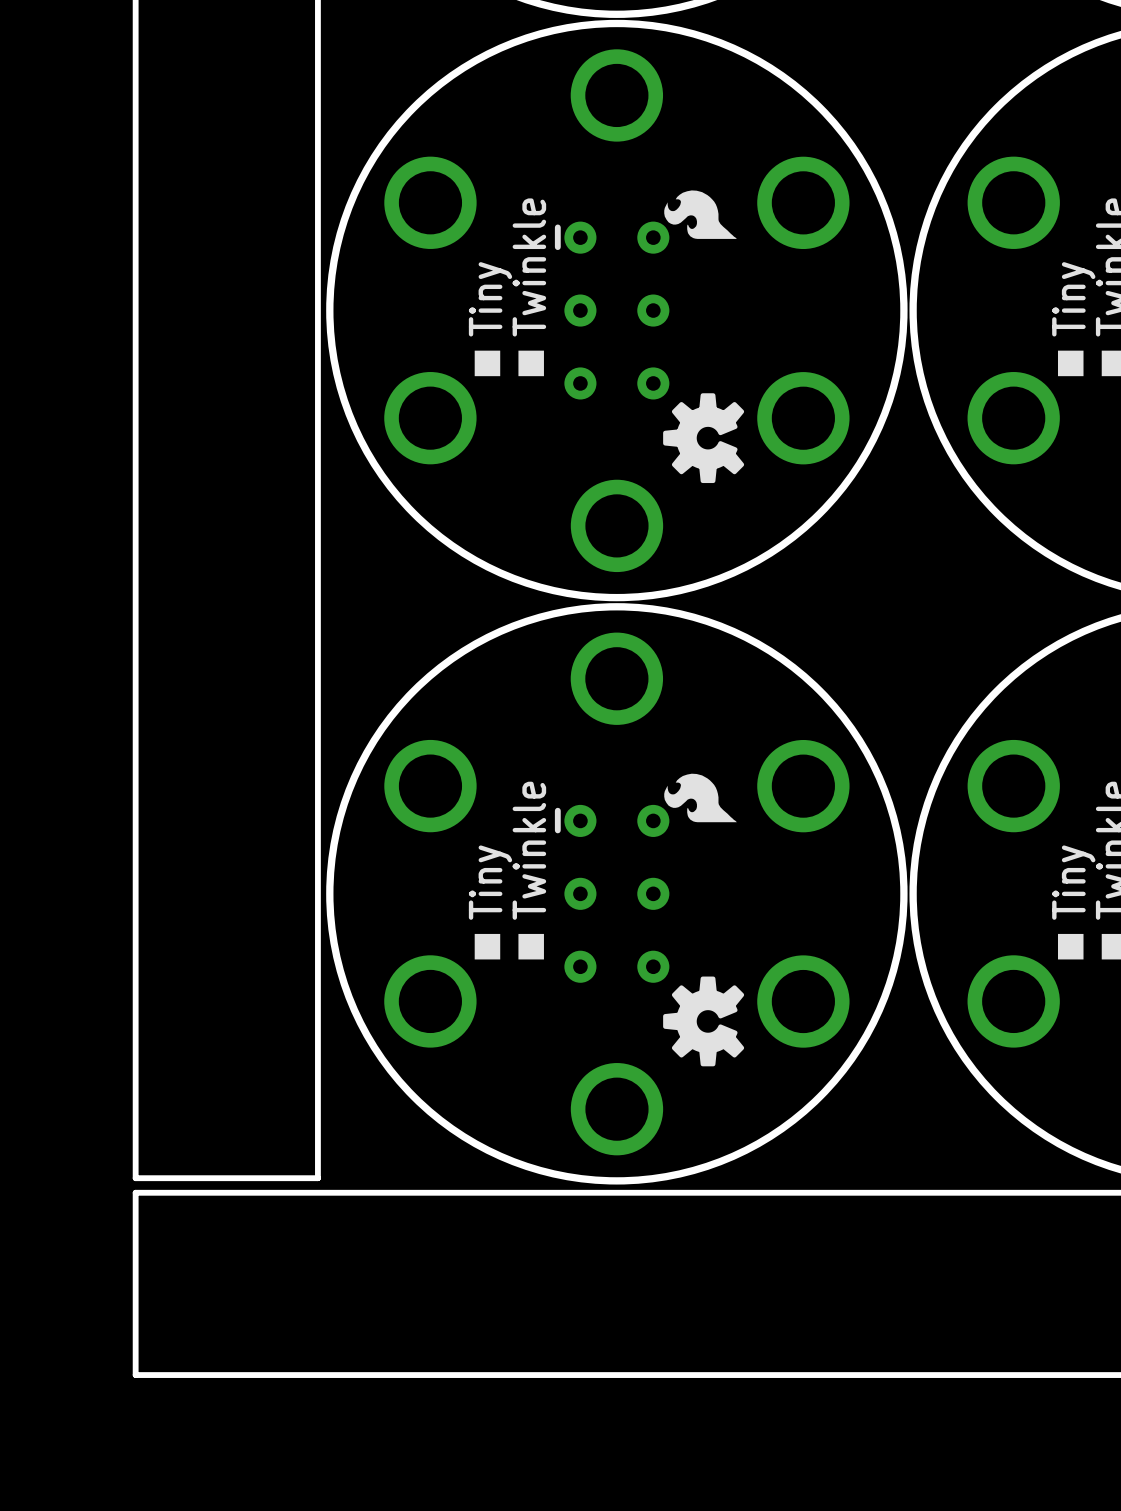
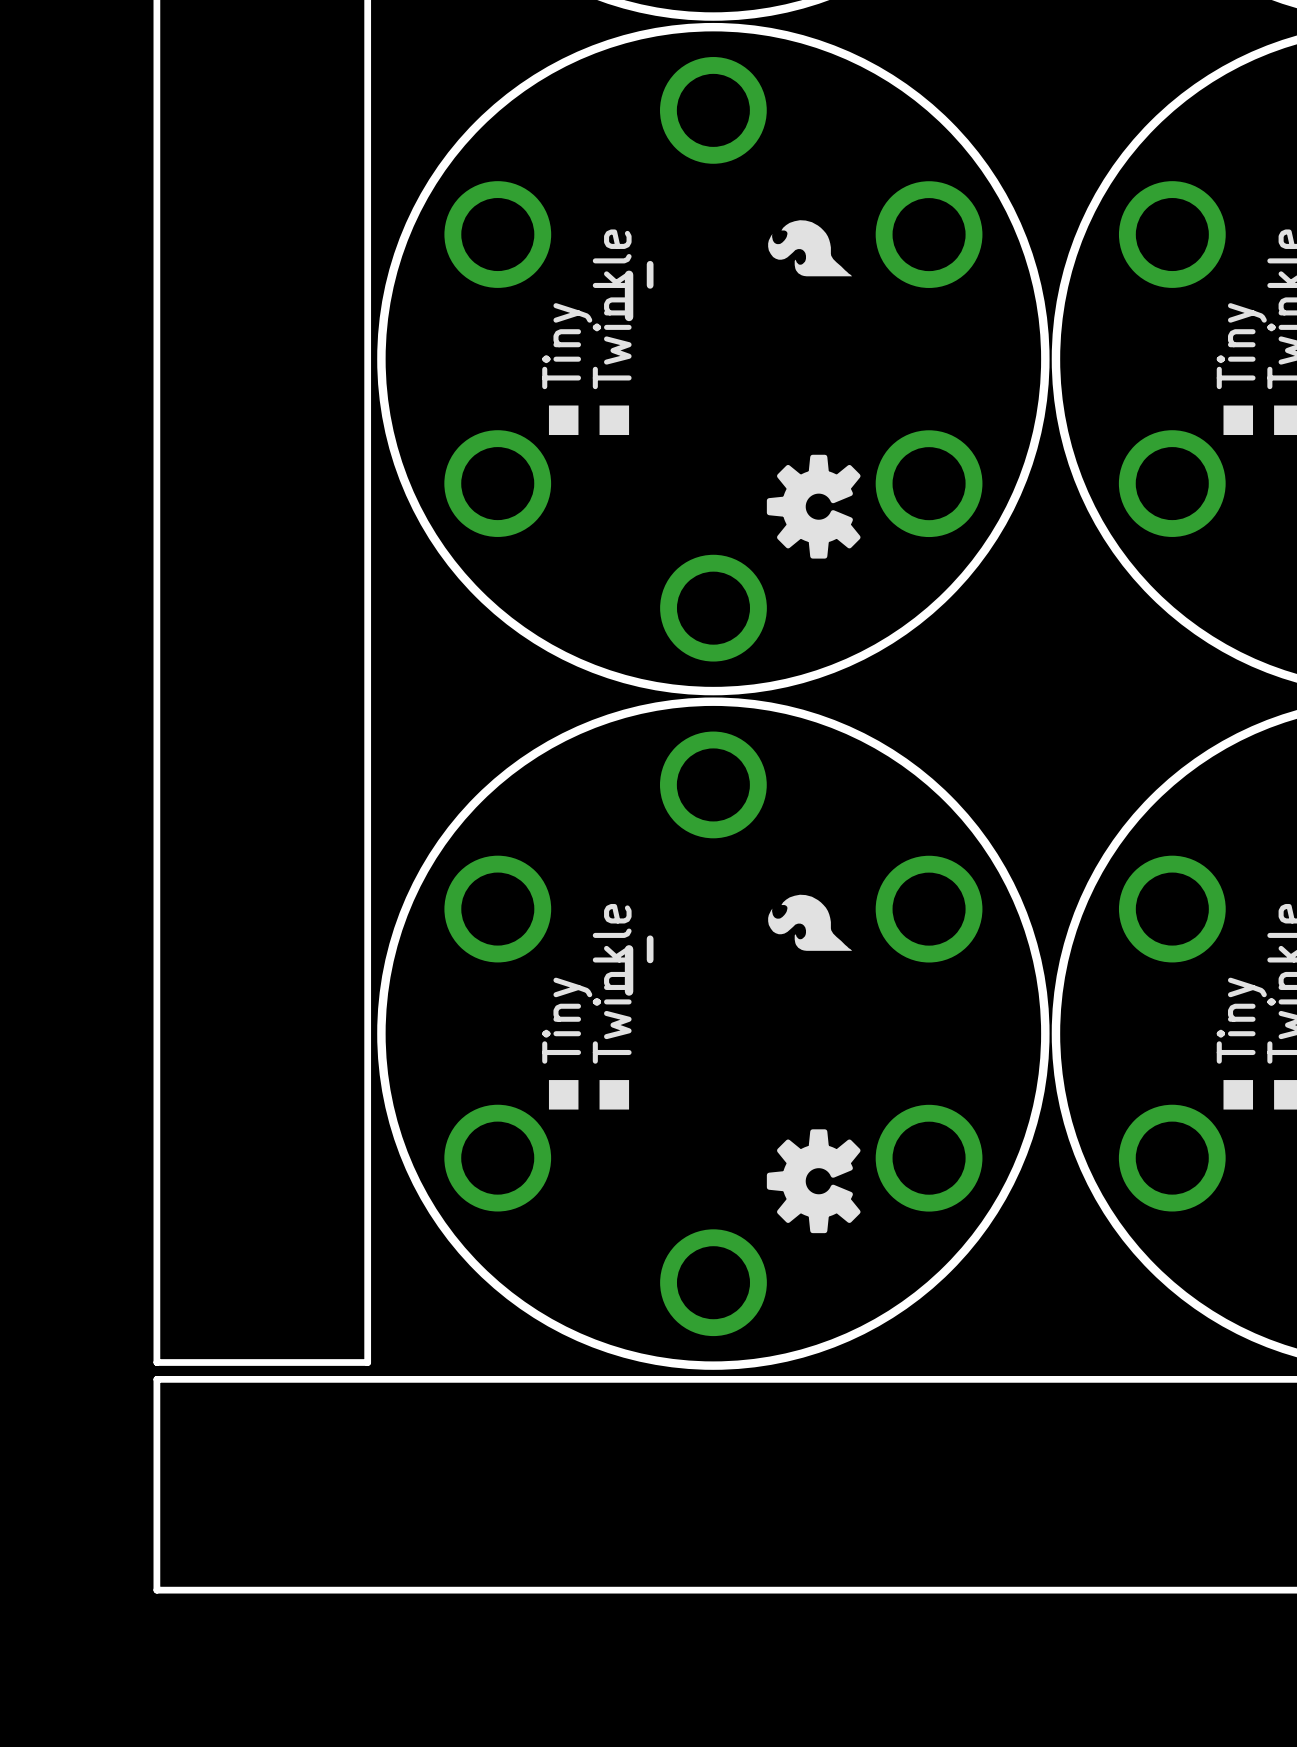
line: none -> (650, 264) (650, 285)
line: none -> (629, 274) (629, 316)
part: (612, 310) -> none
line: none -> (650, 938) (650, 959)
line: none -> (629, 949) (629, 991)
part: (612, 893) -> none

